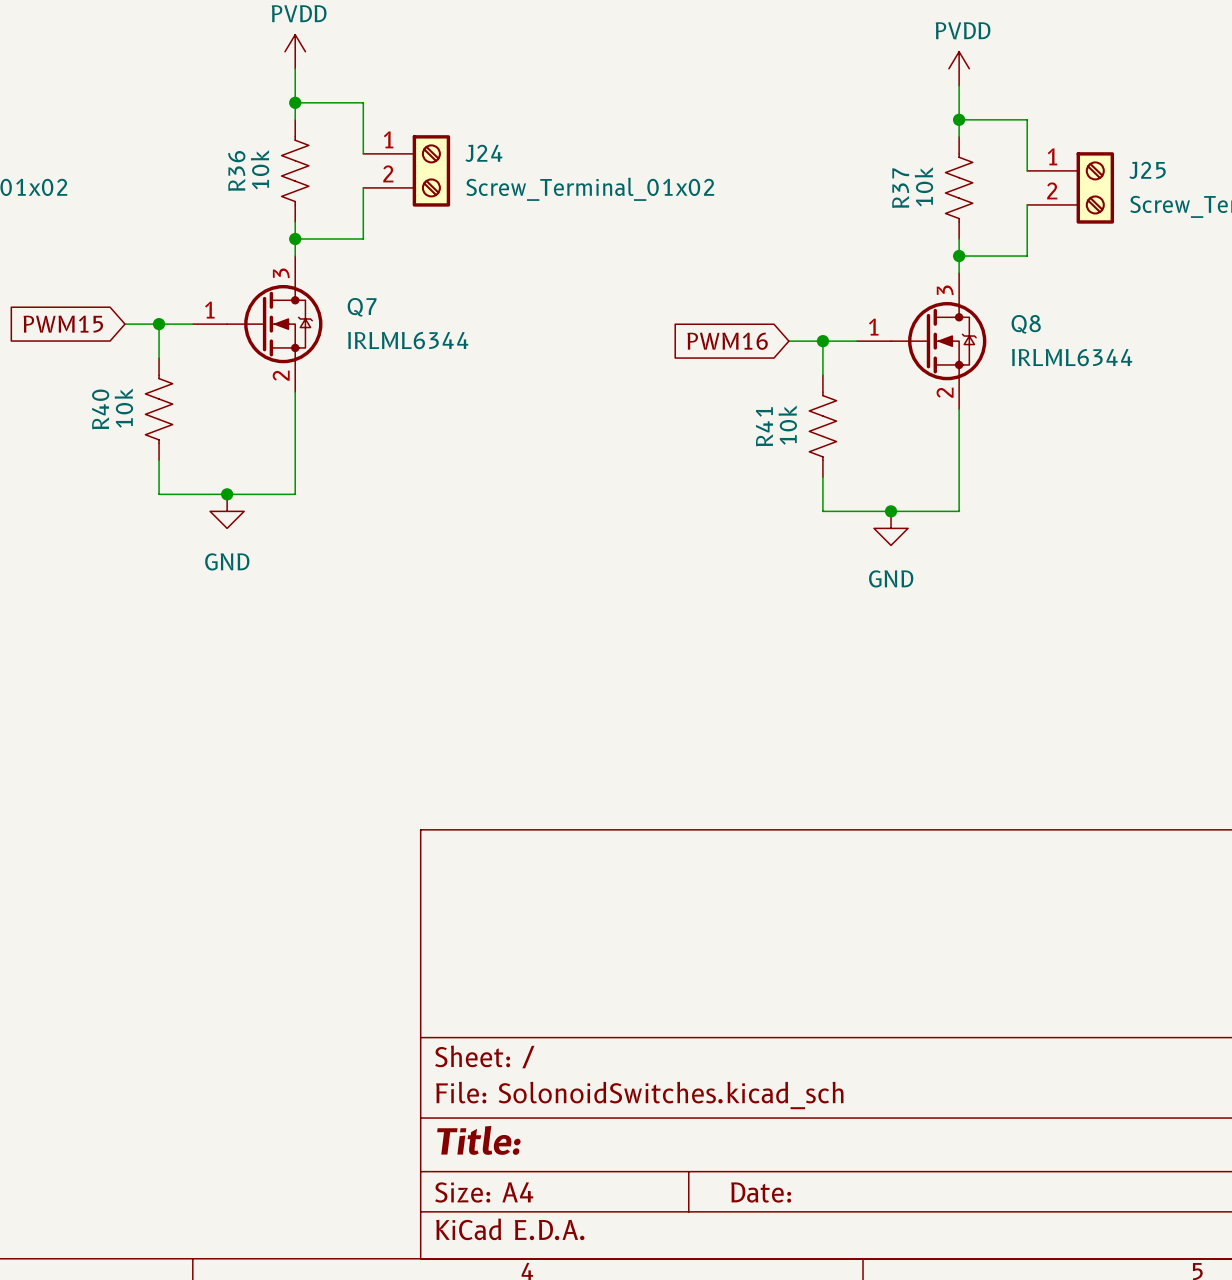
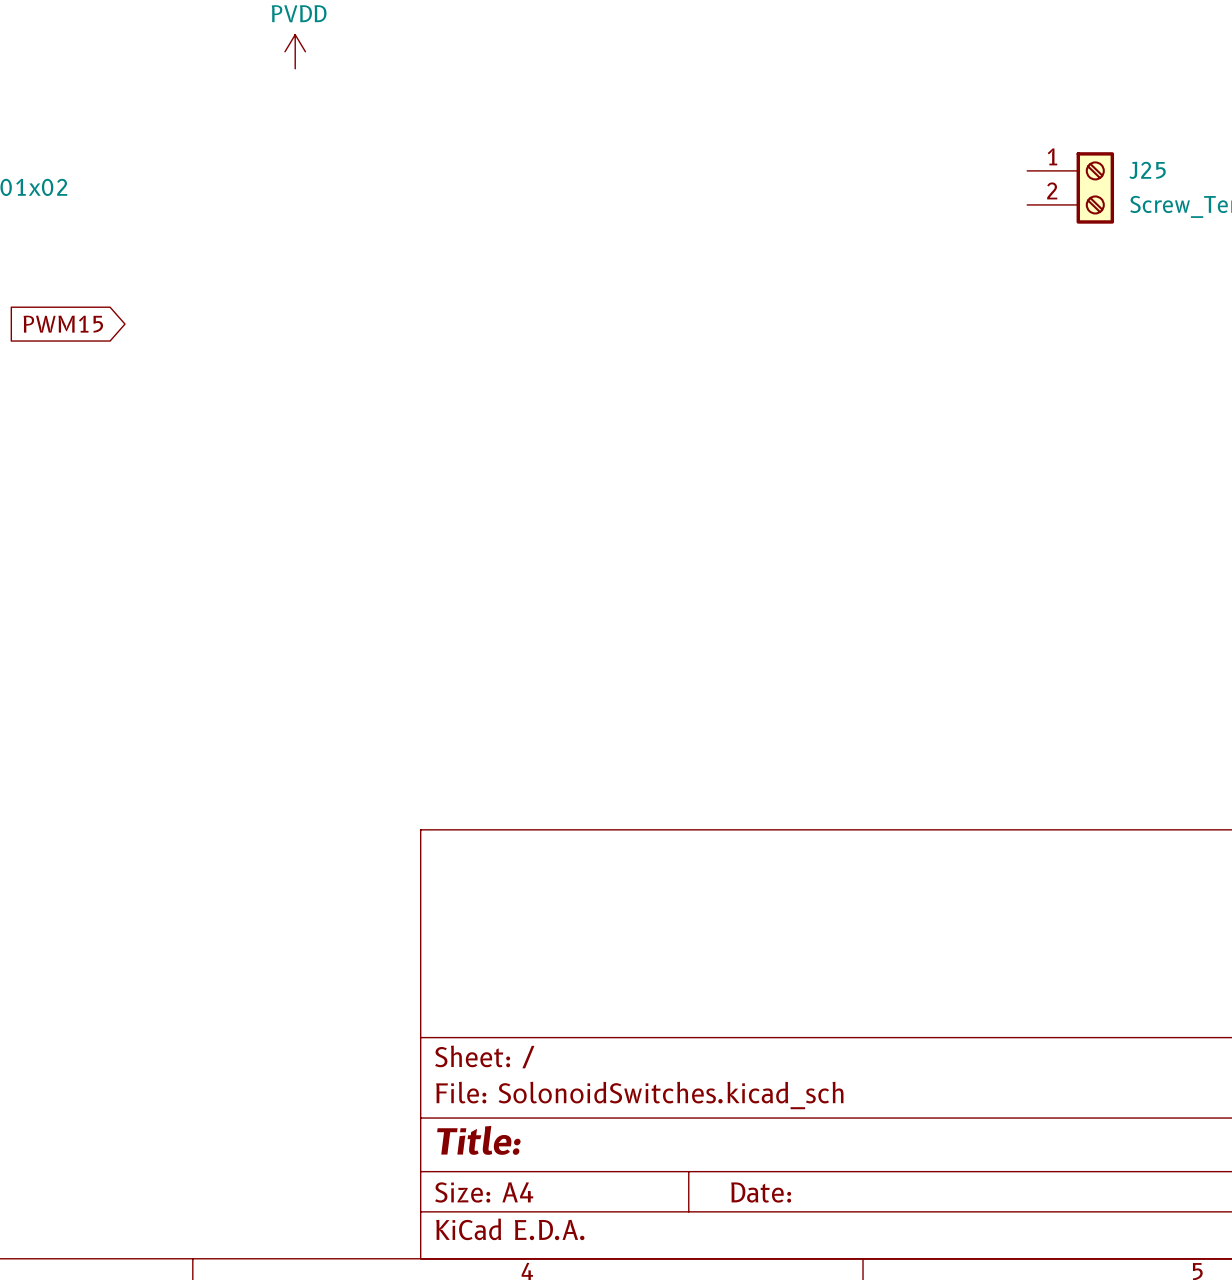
wire: (295, 68) (295, 119) -> none
power symbol: PVDD (959, 68) -> none
wire: (959, 85) (959, 136) -> none
wire: (295, 102) (363, 102) (363, 153) -> none
junction: (295, 102) -> none
wire: (959, 119) (1027, 119) (1027, 170) -> none
junction: (959, 119) -> none
R36: 10k (295, 170) -> none
J24: Screw_Terminal_01x02 (406, 170) -> none
wire: (363, 187) (363, 239) (295, 239) -> none
R37: 10k (959, 187) -> none
wire: (1027, 204) (1027, 256) (959, 256) -> none
wire: (295, 221) (295, 256) -> none
junction: (295, 239) -> none
wire: (959, 239) (959, 273) -> none
junction: (959, 256) -> none
wire: (124, 324) (193, 324) -> none
wire: (159, 324) (159, 358) -> none
junction: (159, 324) -> none
Q7: IRLML6344 (257, 324) -> none
global label: PWM16 (727, 341) -> none
wire: (788, 341) (856, 341) -> none
wire: (822, 341) (822, 375) -> none
junction: (822, 341) -> none
Q8: IRLML6344 (921, 341) -> none
wire: (295, 392) (295, 494) (159, 494) (159, 460) -> none
R40: 10k (159, 409) -> none
wire: (959, 409) (959, 511) (822, 511) (822, 477) -> none
R41: 10k (822, 426) -> none
junction: (227, 494) -> none
power symbol: GND (227, 511) -> none
junction: (891, 511) -> none
power symbol: GND (891, 528) -> none

